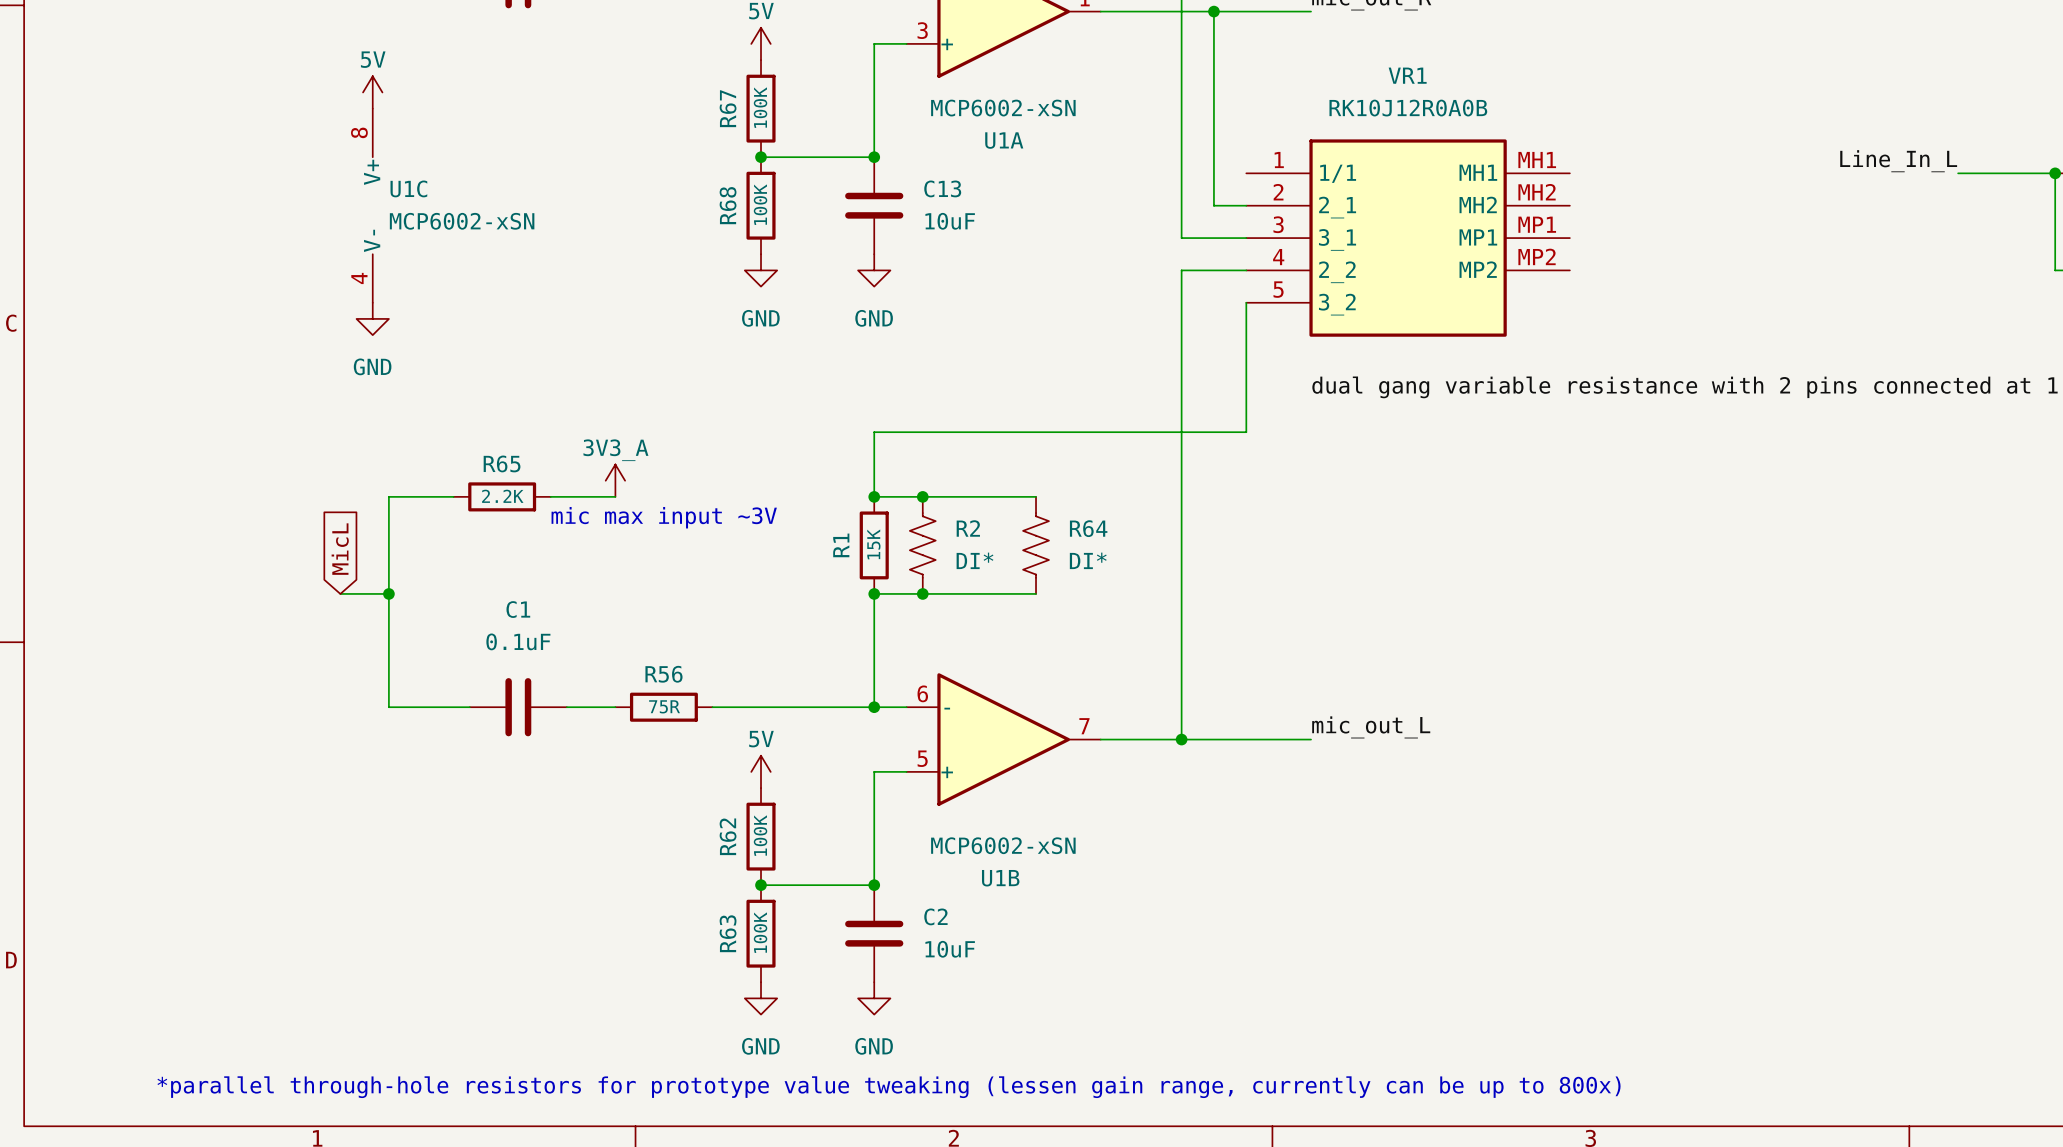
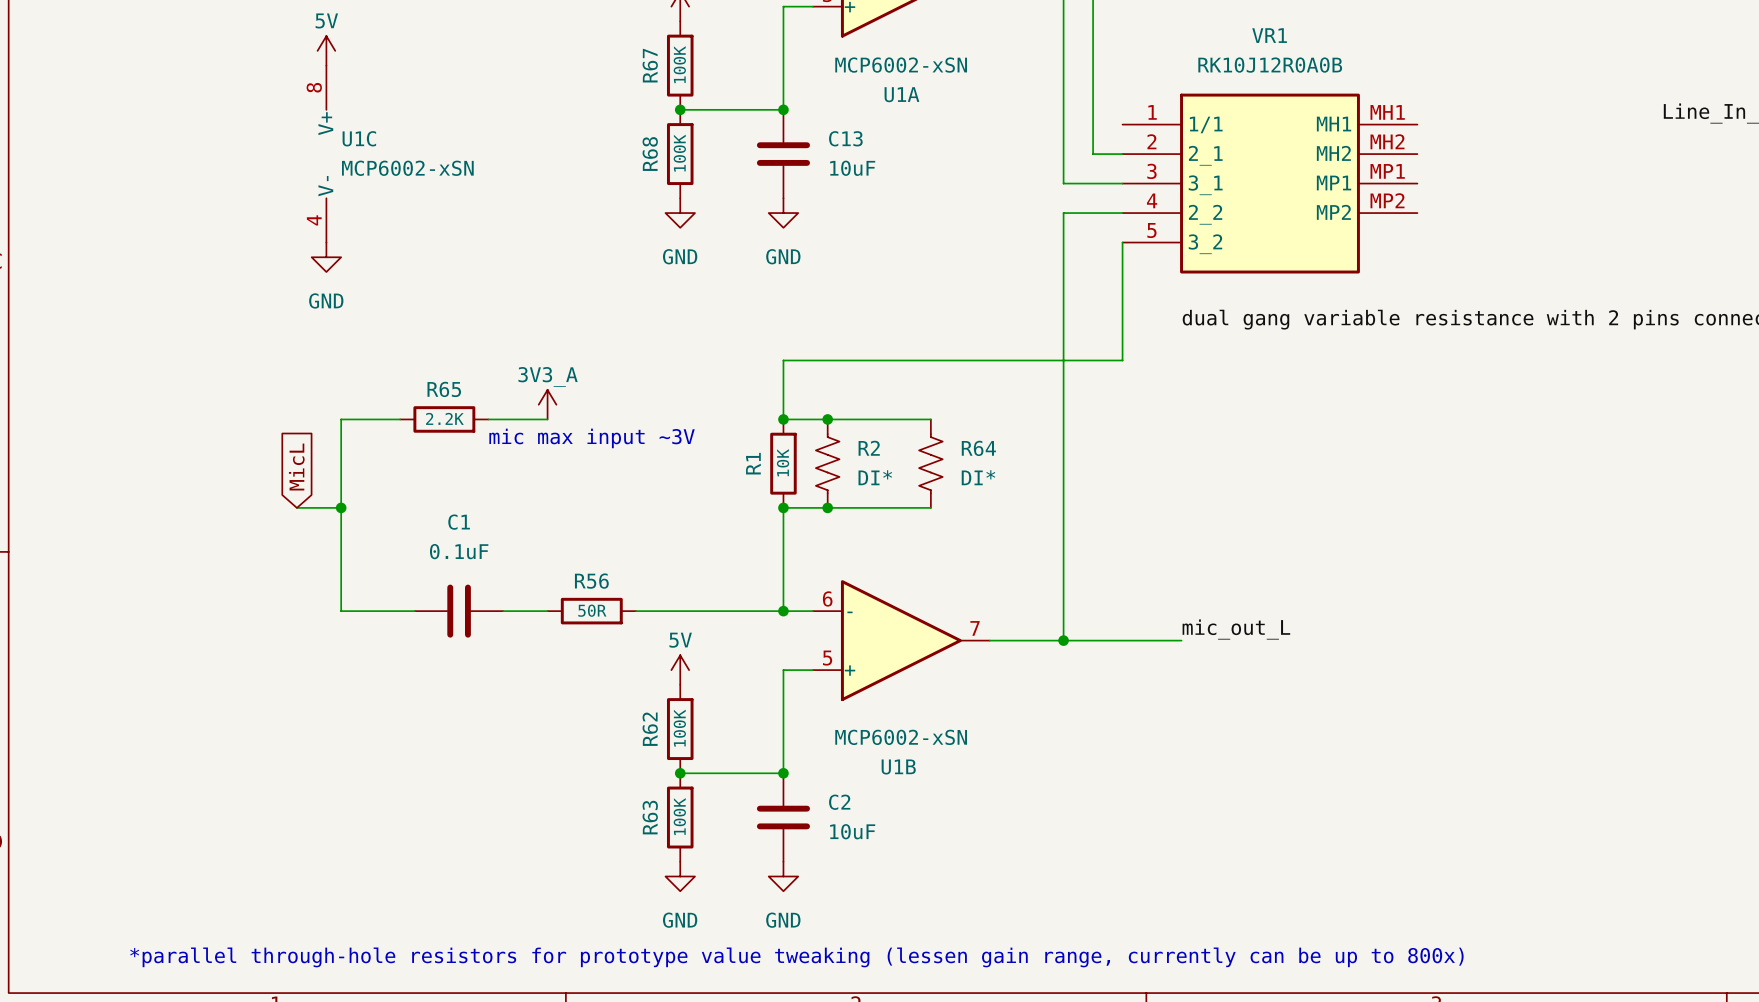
R1 value: 15K (873, 544) -> 10K (783, 462)
R56 value: 75R (664, 706) -> 50R (592, 610)

